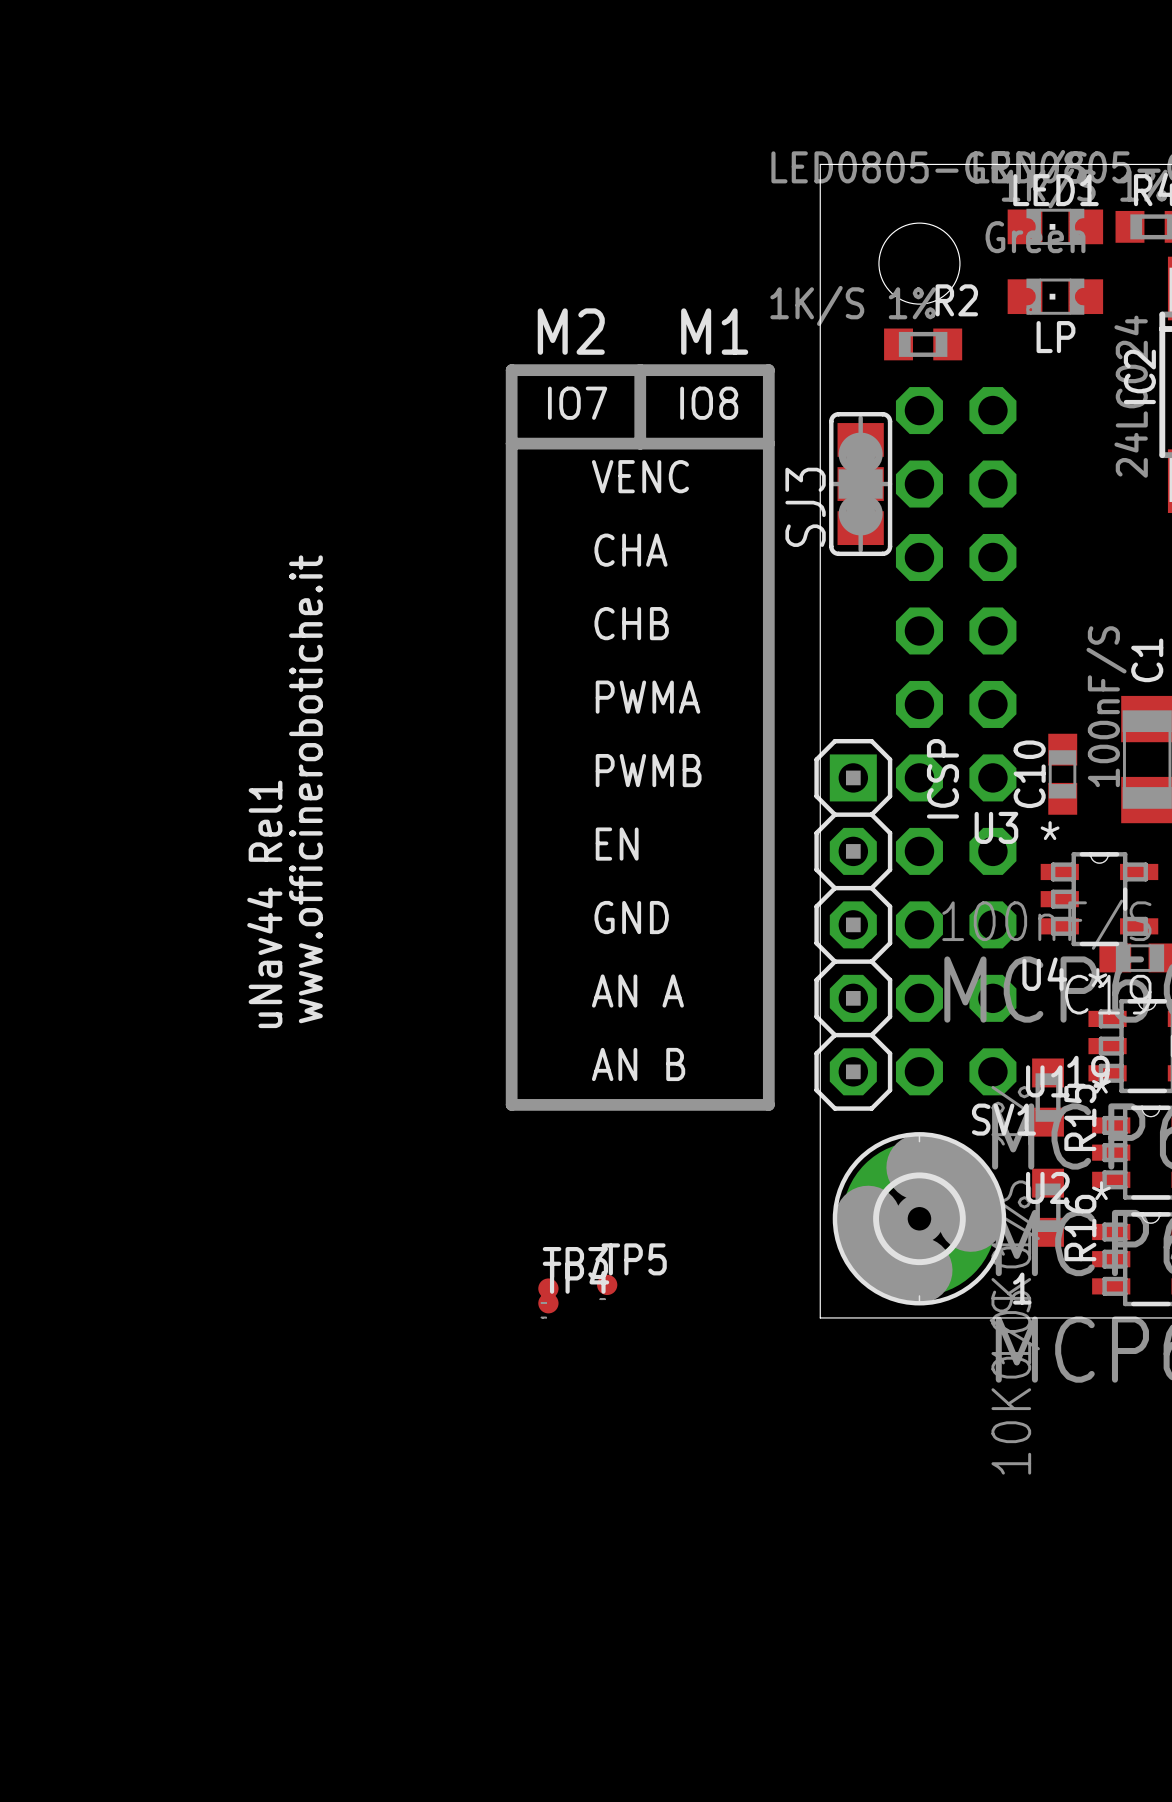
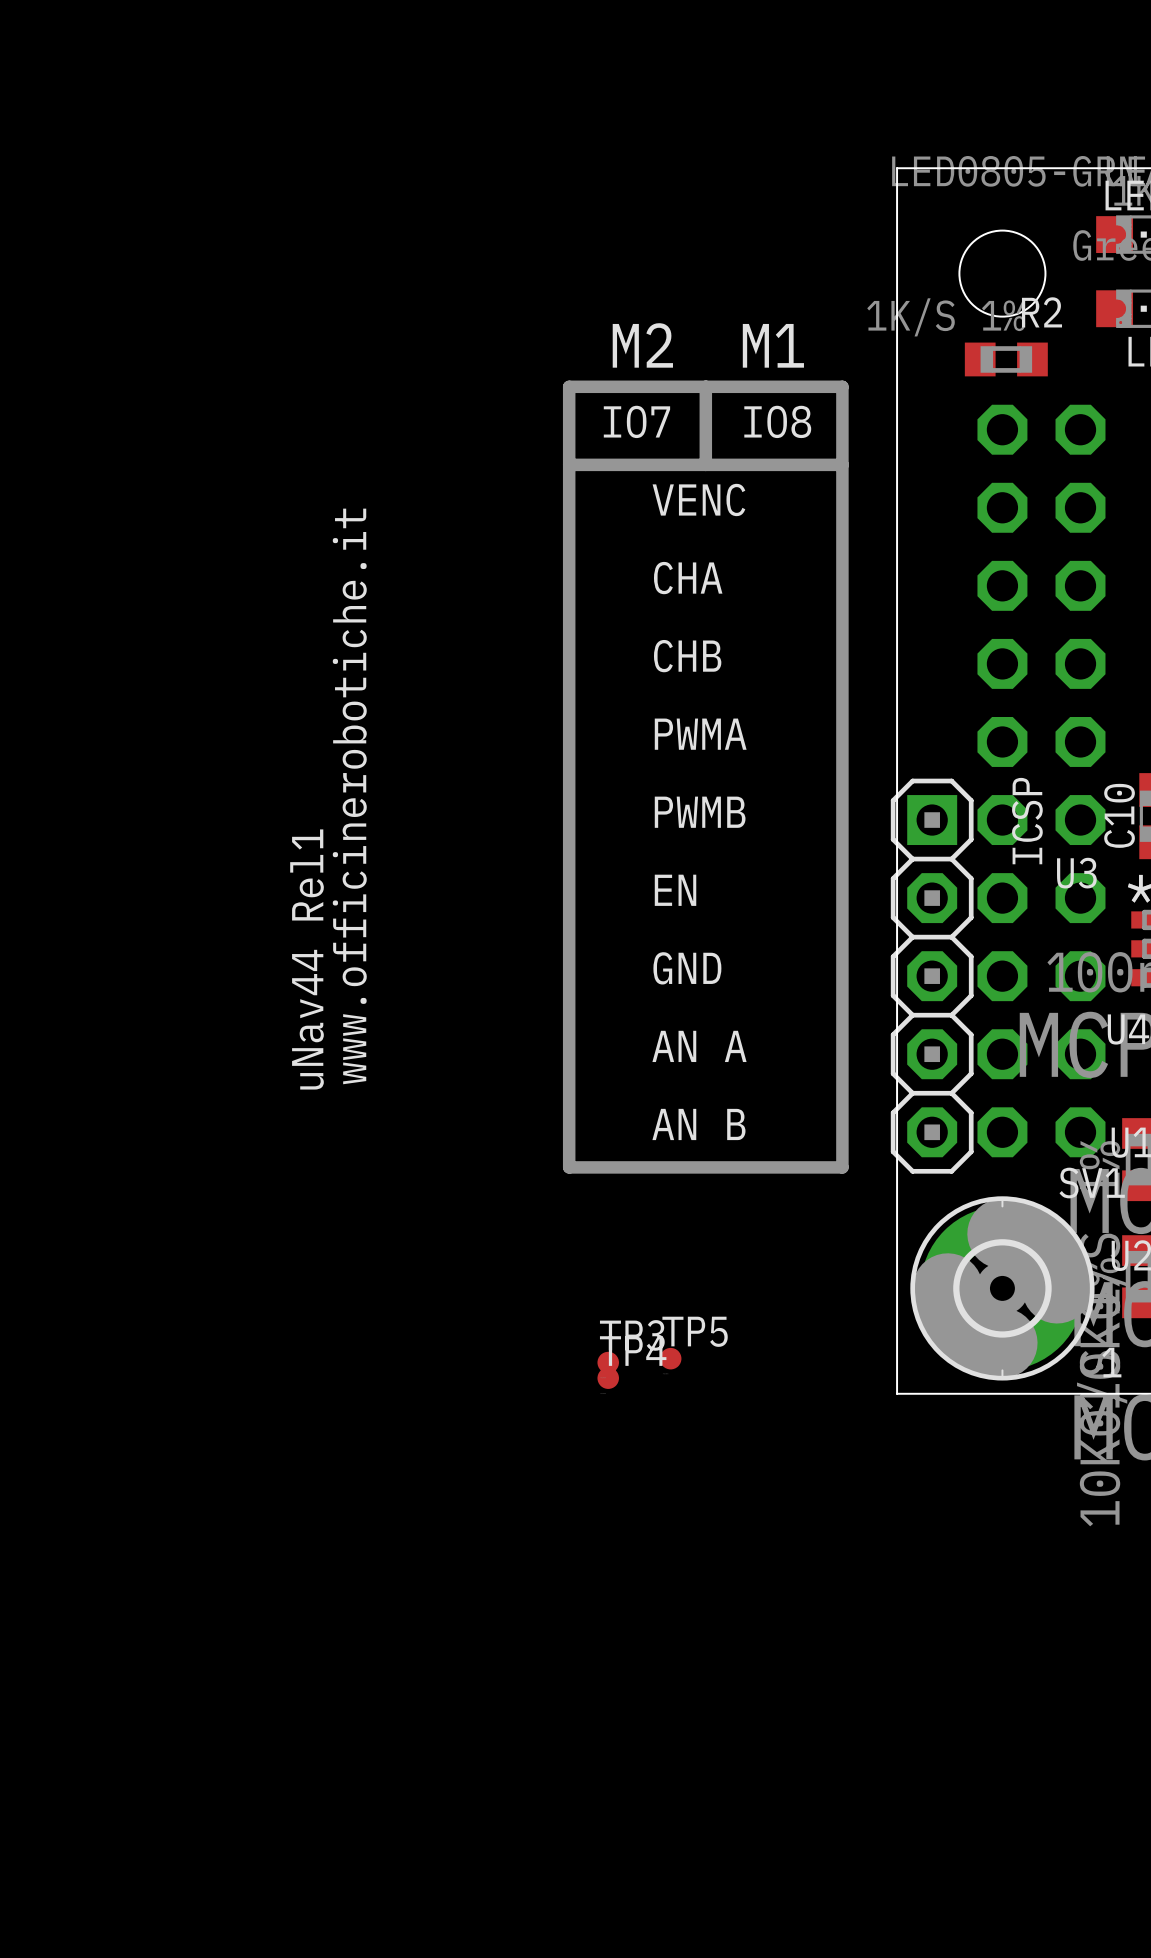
SJ3: (860, 484) -> none

